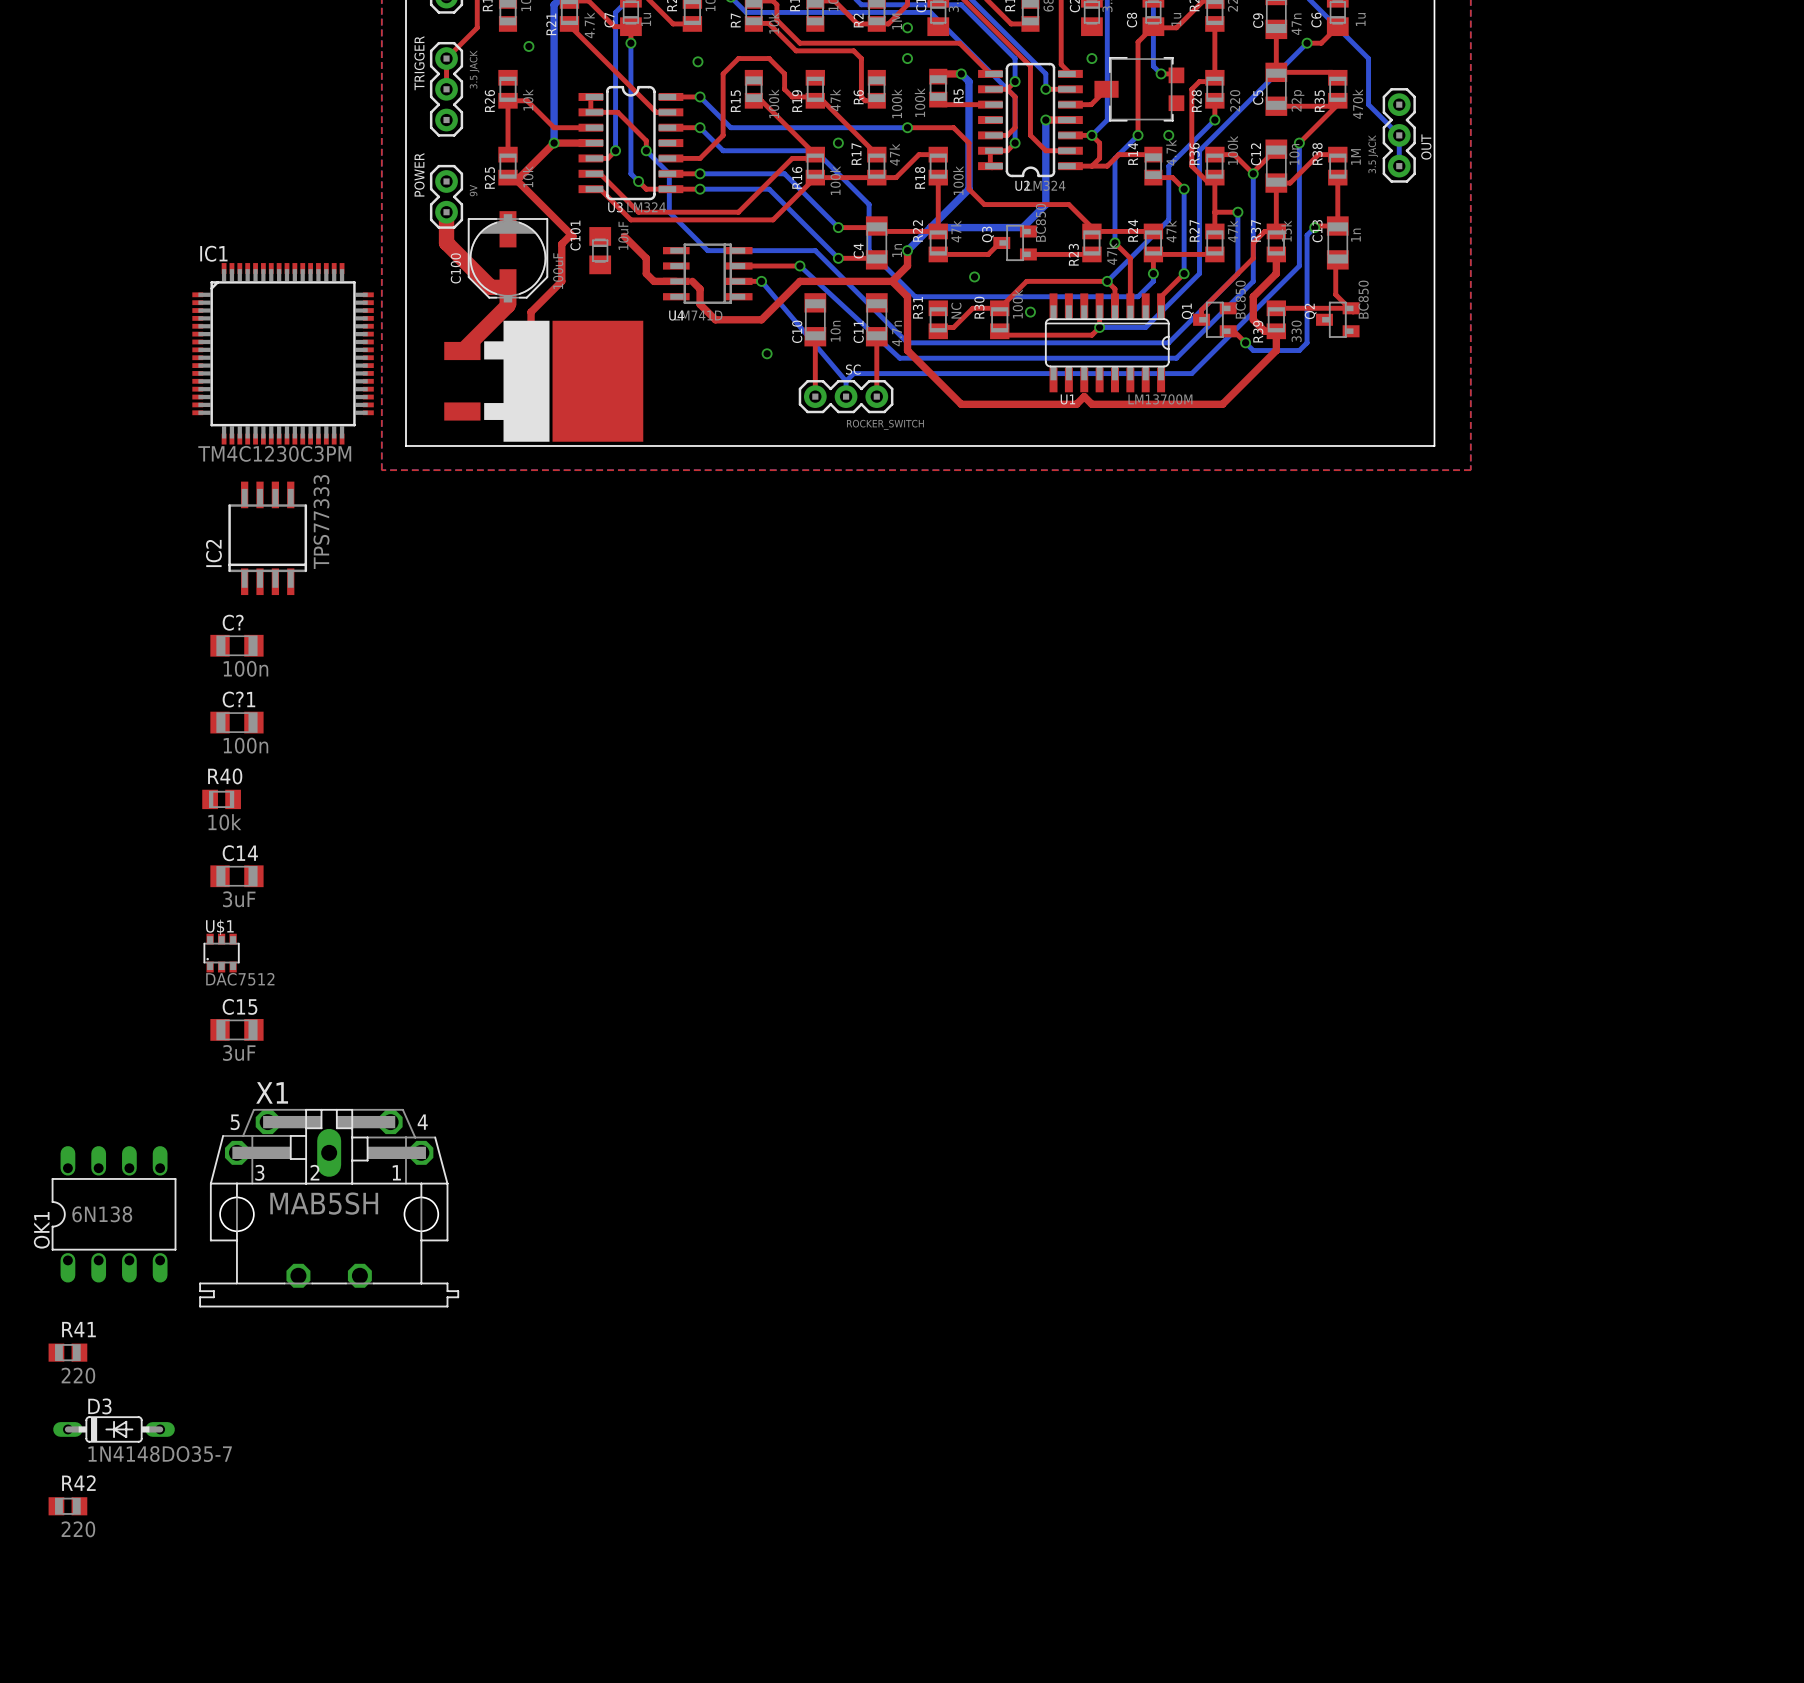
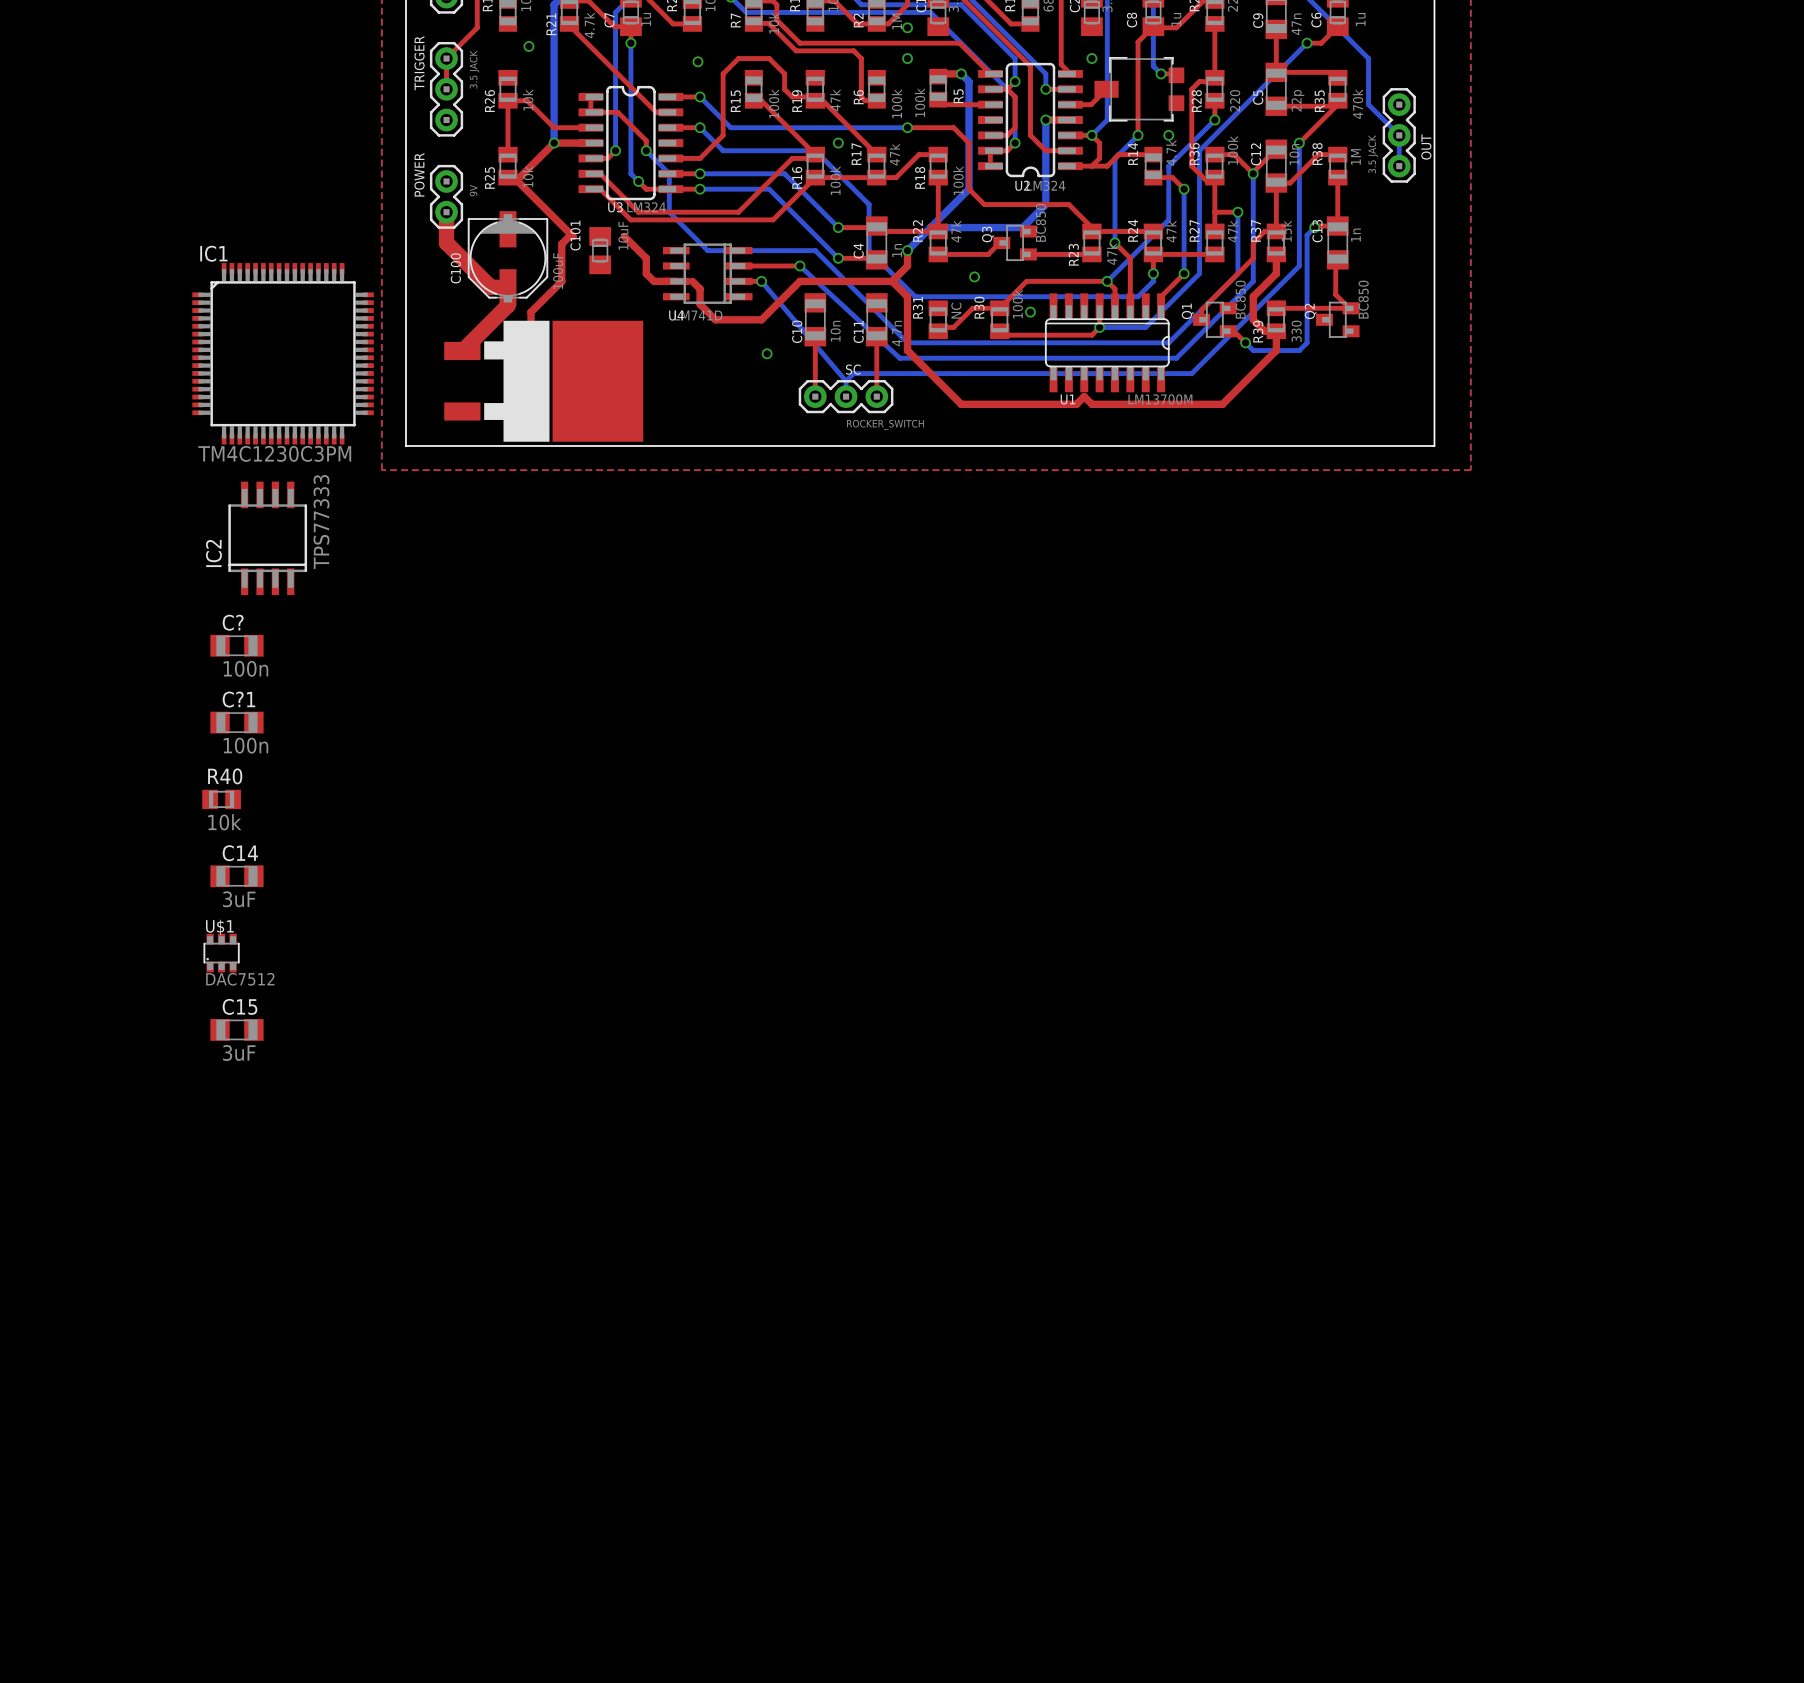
X1: MAB5SH (329, 1208) -> none
OK1: 6N138 (114, 1214) -> none
R41: 220 (67, 1352) -> none
D3: 1N4148DO35-7 (114, 1429) -> none
R42: 220 (67, 1506) -> none

